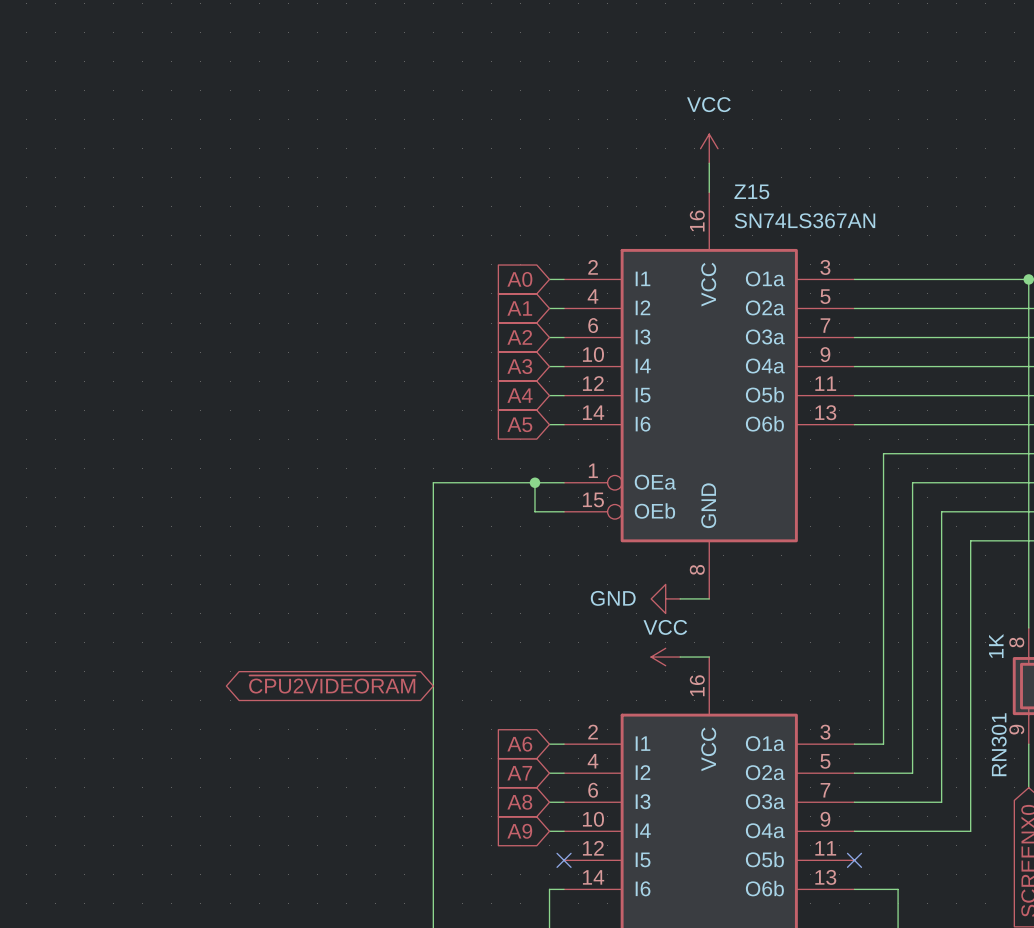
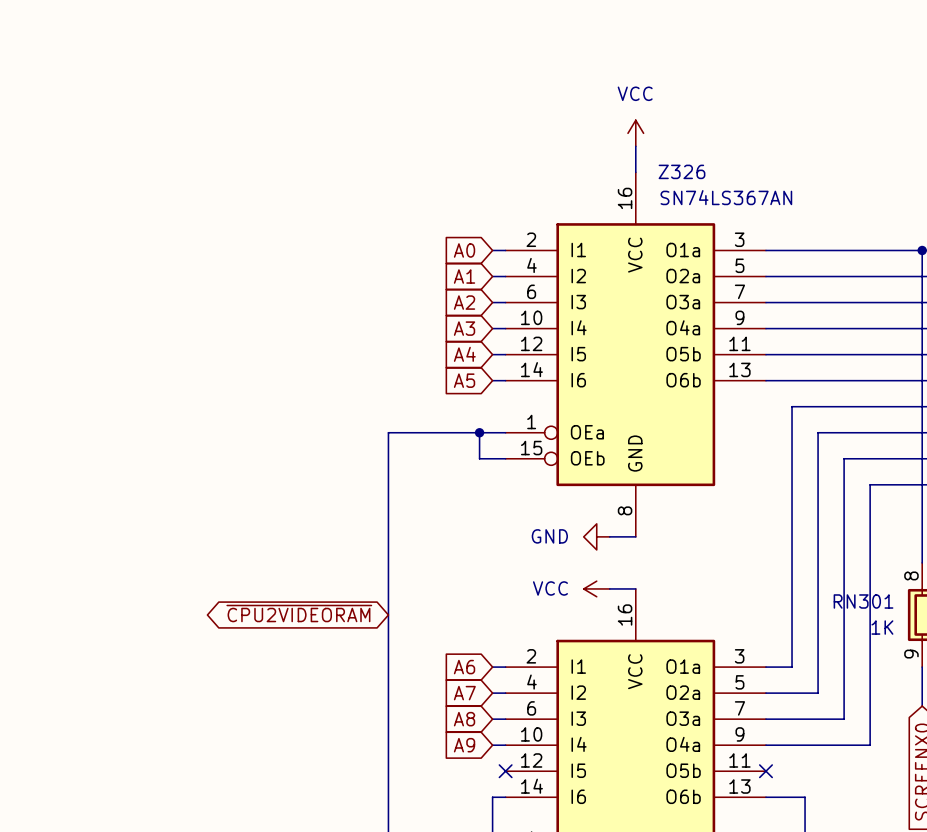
Z15 name: Z15 (751, 191) -> Z326 (682, 171)
power symbol text position: VCC (665, 627) -> VCC (550, 588)
RN301 value rotation: 0° (996, 646) -> 90° clockwise (882, 627)
RN301 value position: 1K (996, 646) -> 1K (882, 627)
RN301 name rotation: 0° (999, 744) -> 90° clockwise (863, 601)
RN301 name position: RN301 (999, 744) -> RN301 (863, 601)

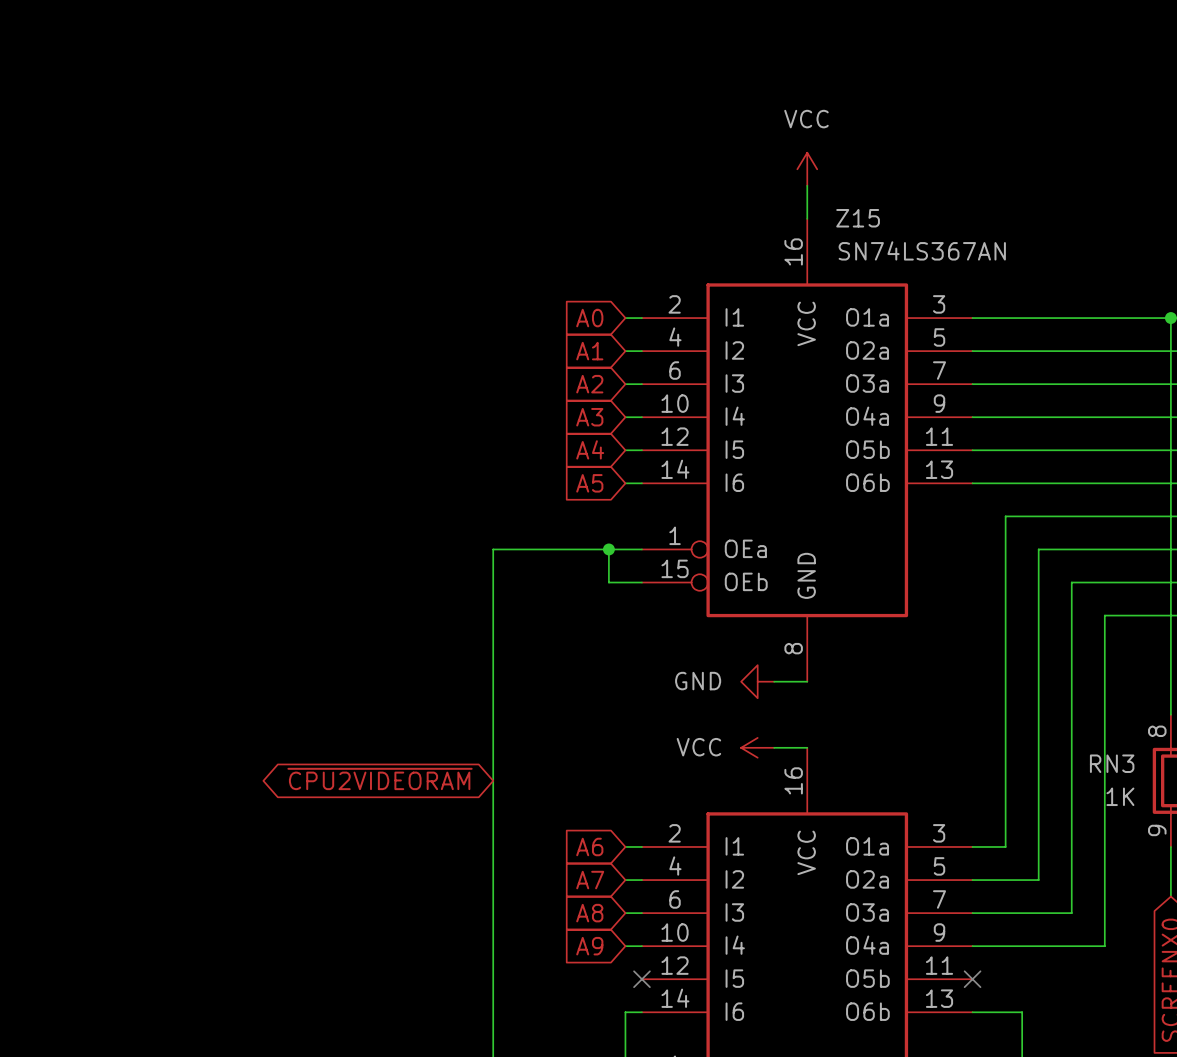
Z326 name: Z326 (682, 171) -> Z15 (858, 218)
RN301 name: RN301 (863, 601) -> RN3 (1112, 763)

